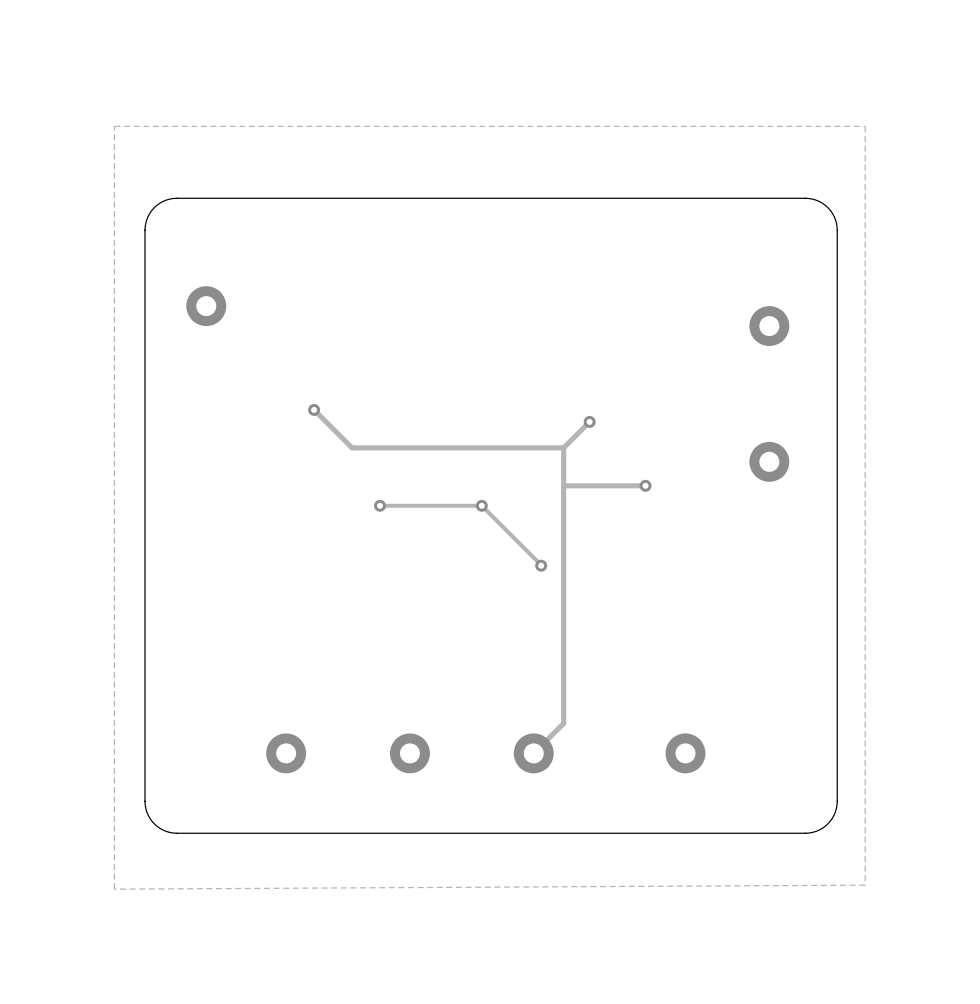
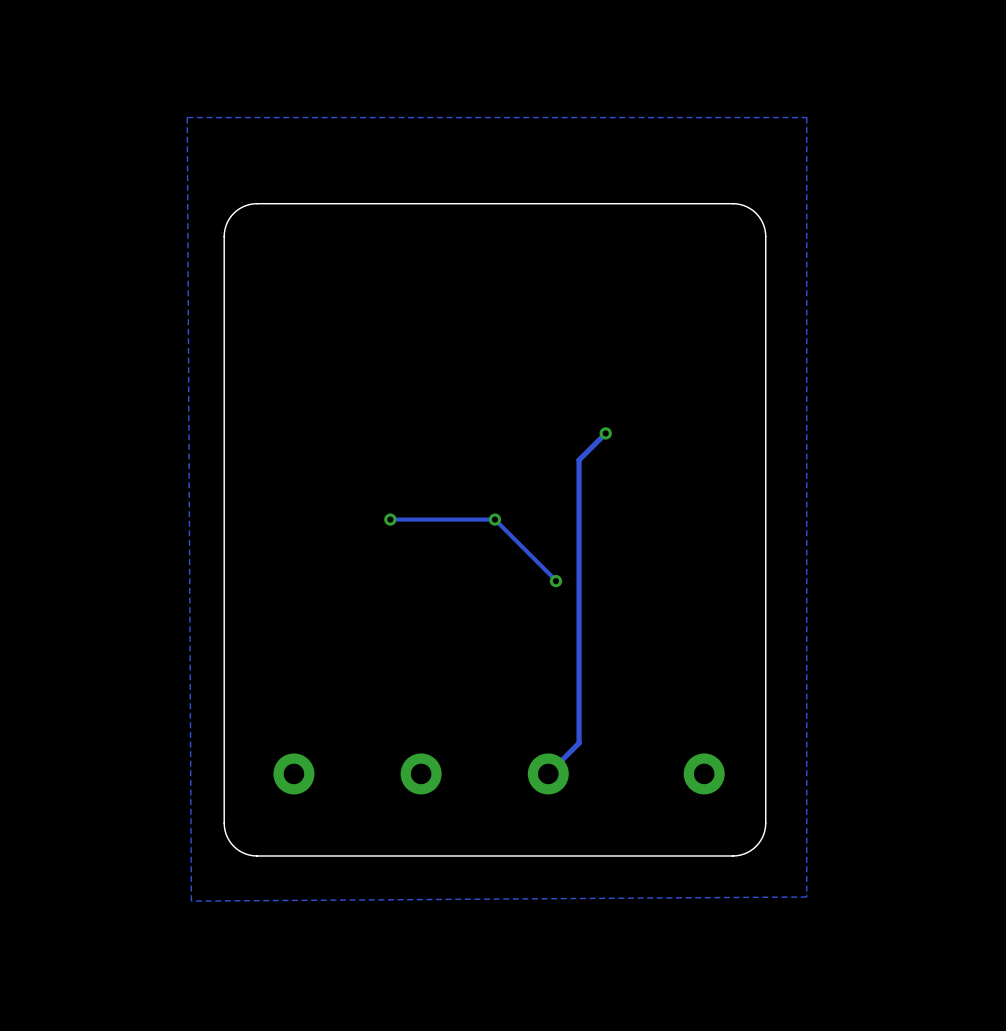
zone outline: (865, 126) (865, 885) (114, 889) (114, 126) (865, 126) -> (806, 117) (806, 897) (191, 901) (187, 117) (806, 117)
board edge: (250, 198) (169, 199) (159, 203) (151, 210) (145, 226) (145, 801) (148, 815) (154, 823) (163, 830) (176, 833) -> (257, 203) (246, 205) (233, 213) (226, 225) (224, 236) (224, 823) (226, 834) (233, 846) (246, 854) (257, 855)
board edge: (713, 198) (812, 199) (822, 203) (830, 210) (835, 219) (837, 230) (836, 808) (827, 823) (812, 832) (713, 833) -> (732, 203) (743, 205) (756, 213) (763, 225) (765, 236) (765, 823) (762, 837) (756, 846) (747, 852) (732, 855)
part: (206, 306) -> none
part: (769, 326) -> none
track: (314, 409) (352, 447) (563, 447) -> none
via: (314, 409) -> none
part: (769, 461) -> none
track: (645, 485) (563, 485) -> none
via: (645, 485) -> none
board edge: (250, 833) (177, 833) -> none

